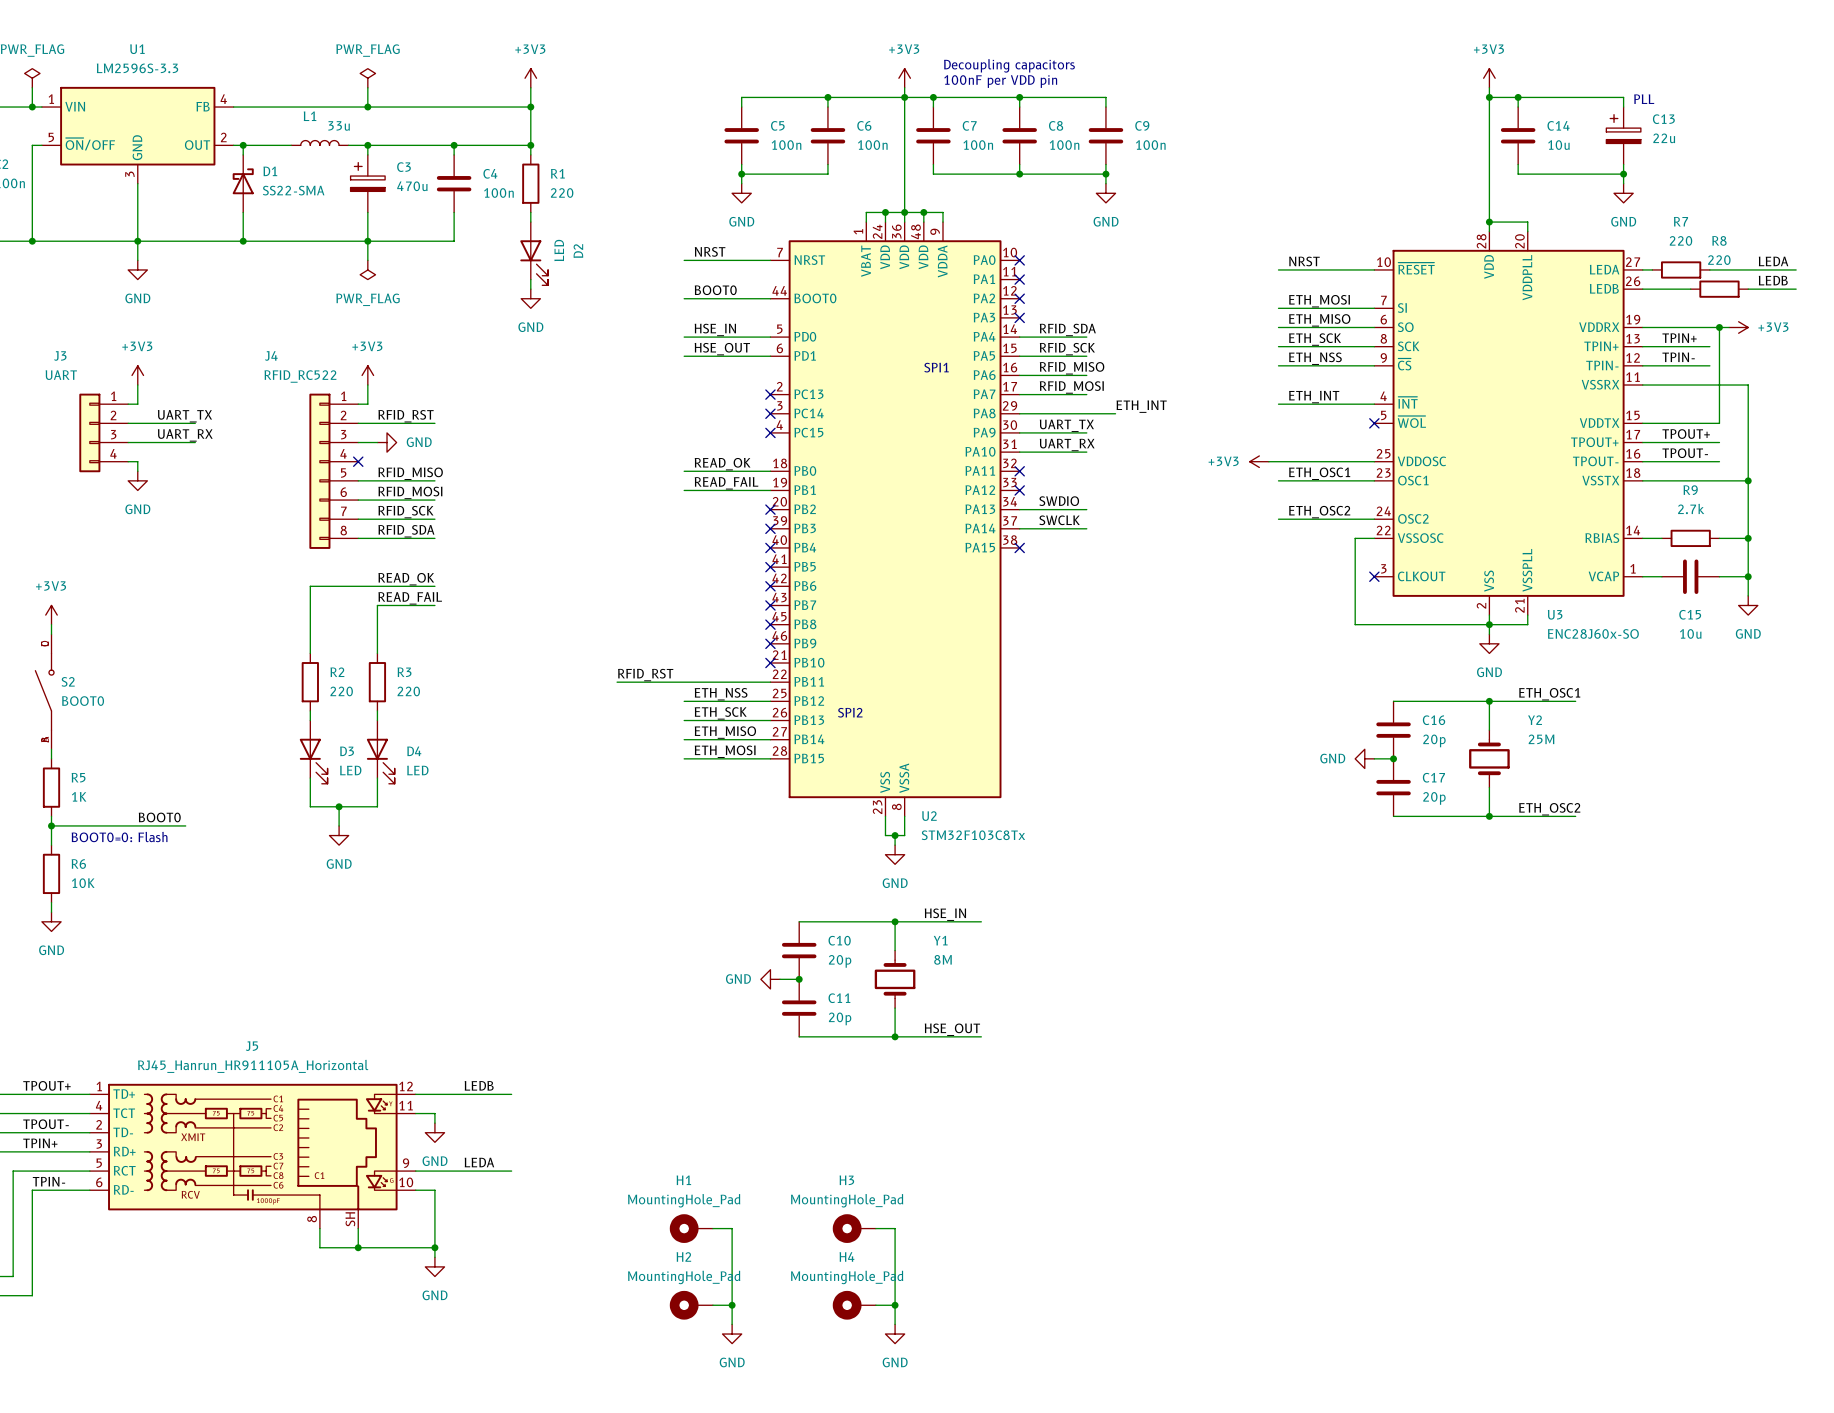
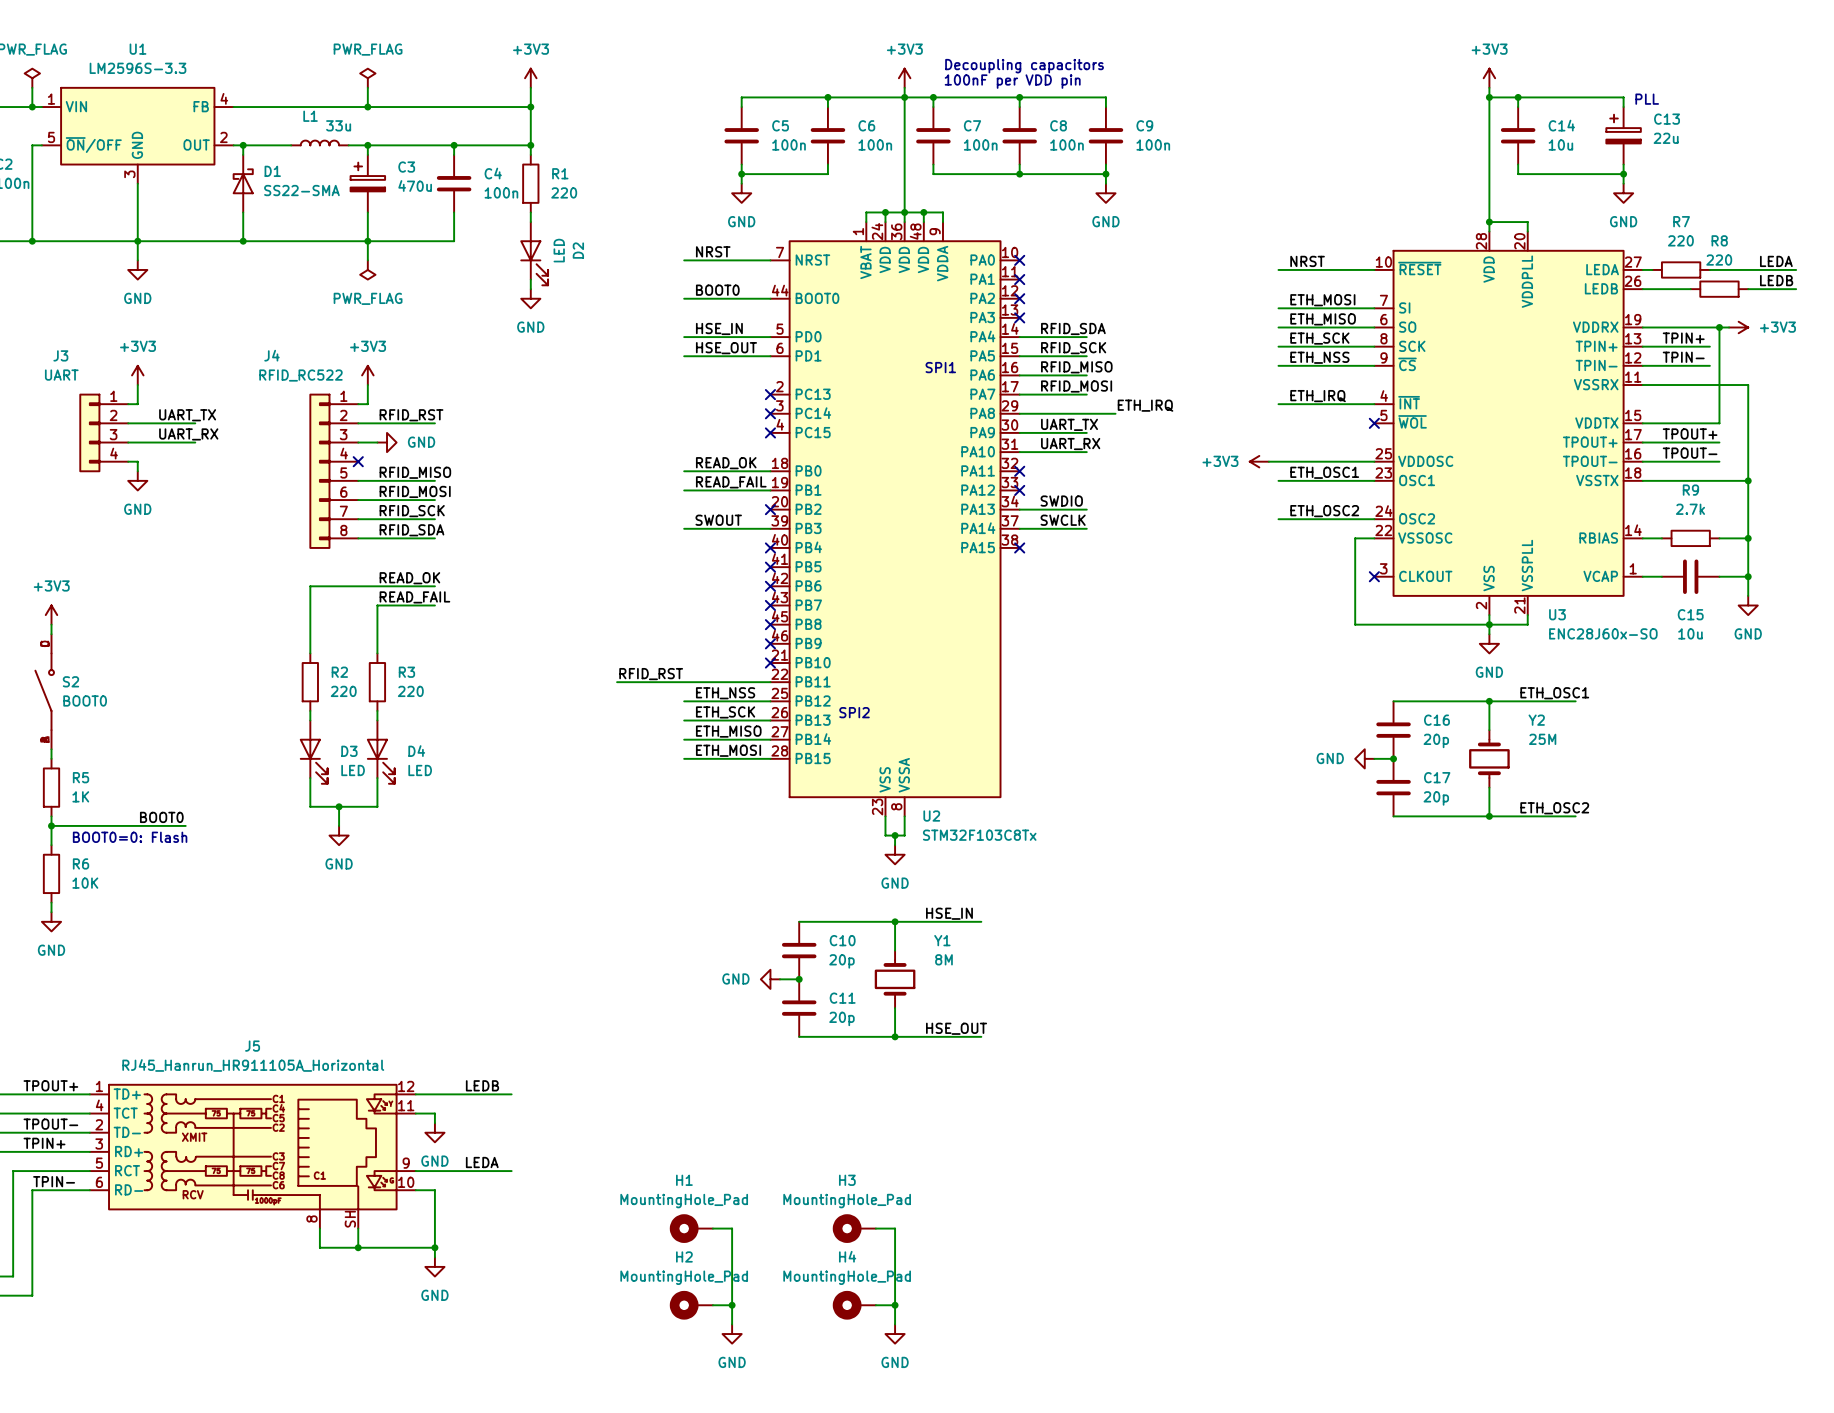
label: ETH_INT (1314, 397) -> ETH_IRQ (1318, 396)
label: ETH_INT (1141, 406) -> ETH_IRQ (1145, 405)
label: none -> SWOUT (718, 520)
wire: none -> (684, 528) (770, 528)
no-connect mark: (770, 528) -> none

